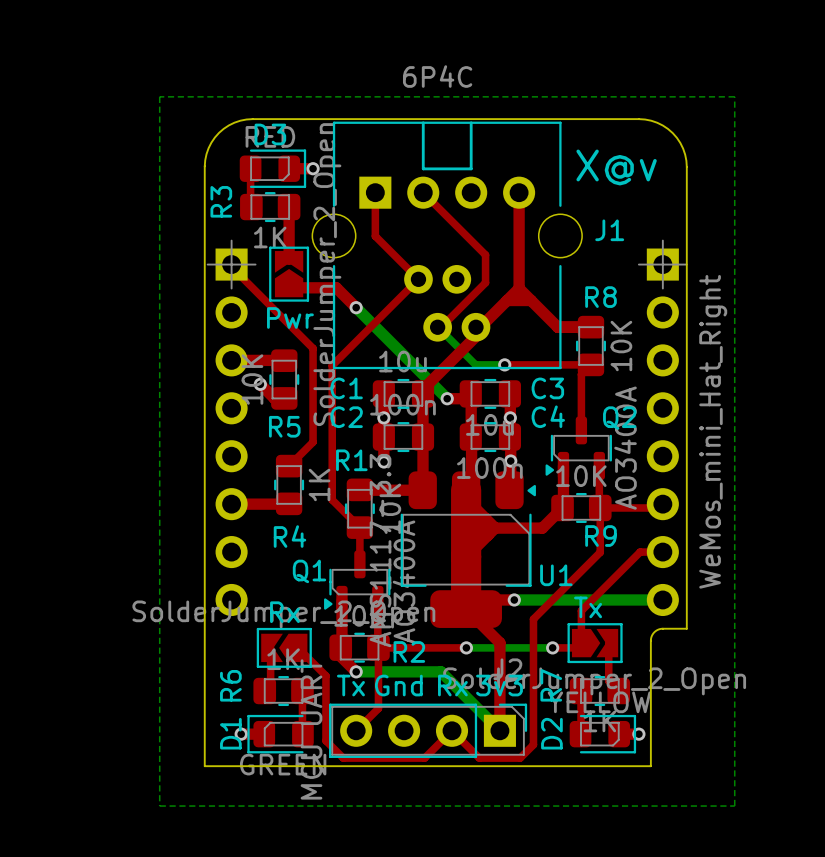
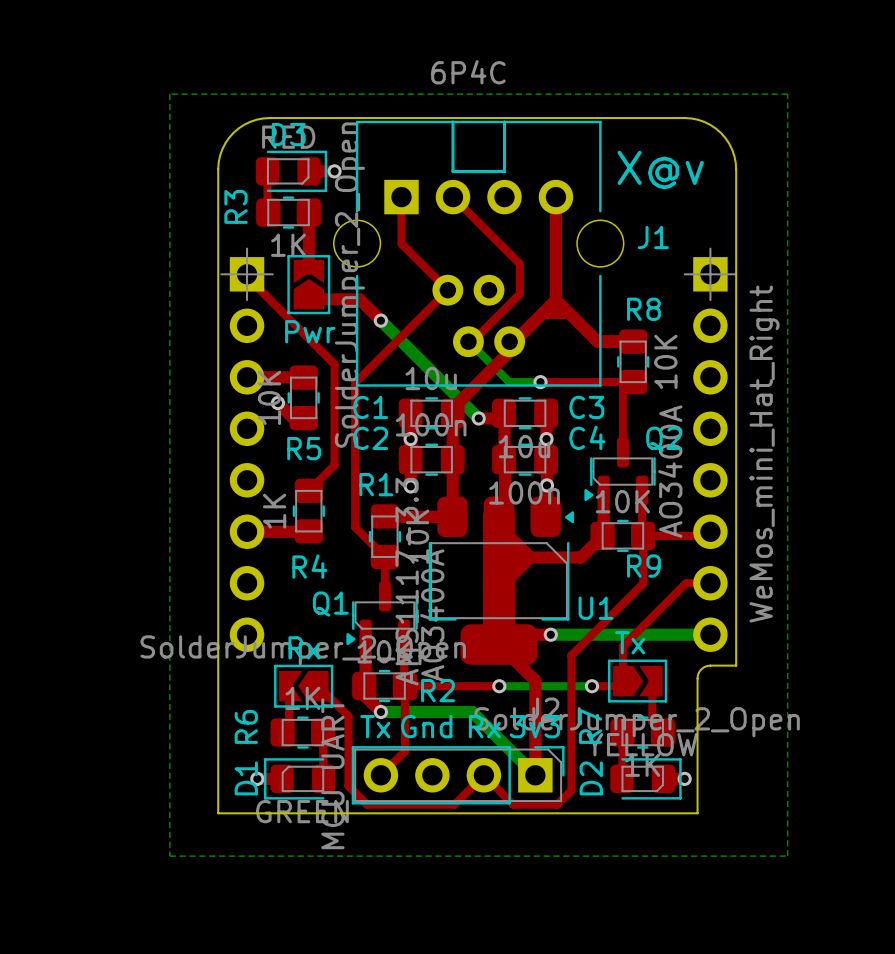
R4 value position: 1K (319, 484) -> 1K (274, 511)

